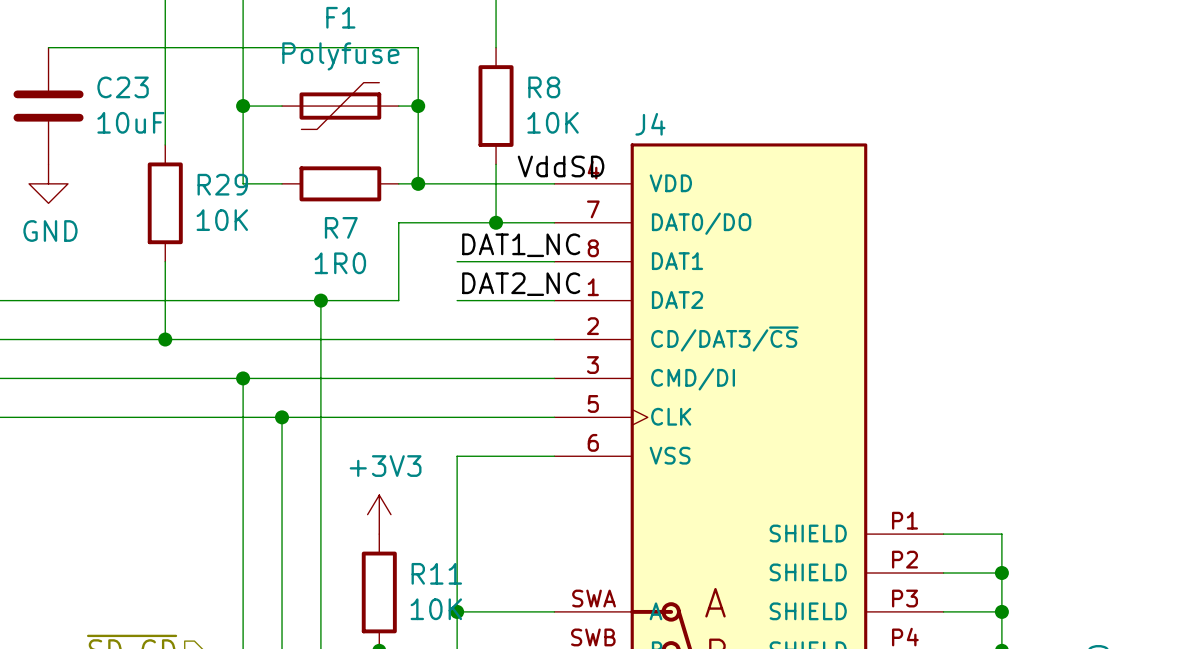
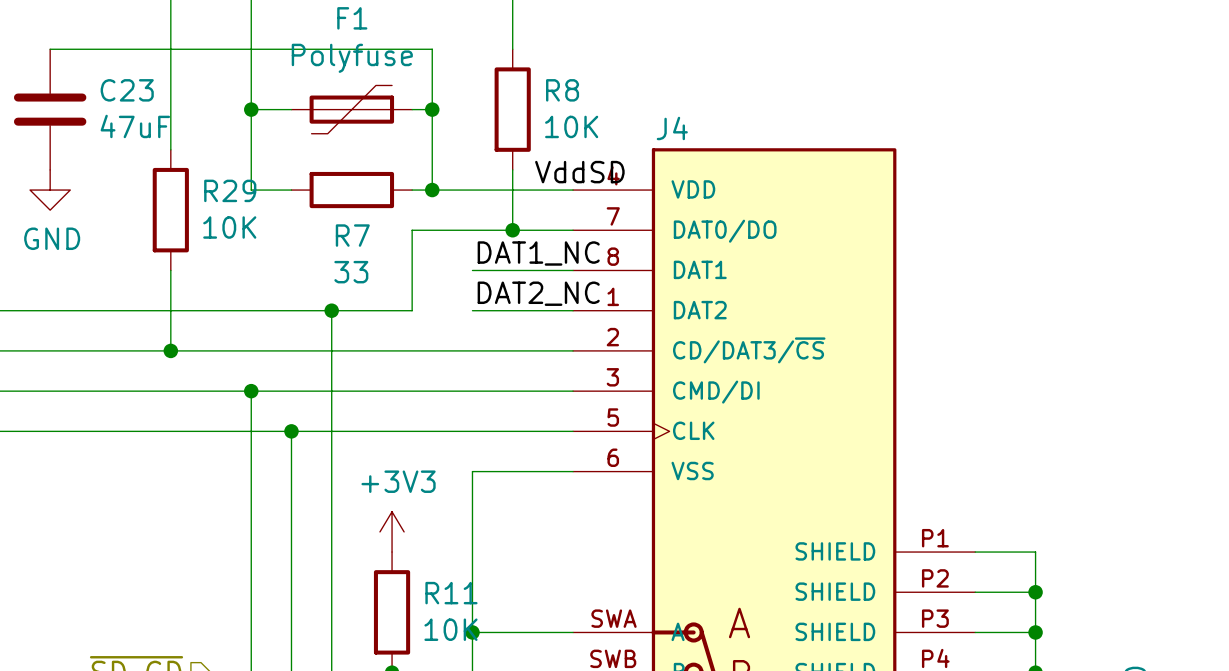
C23 value: 10uF (130, 122) -> 47uF (135, 126)
R7 value: 1R0 (340, 263) -> 33 (351, 272)

